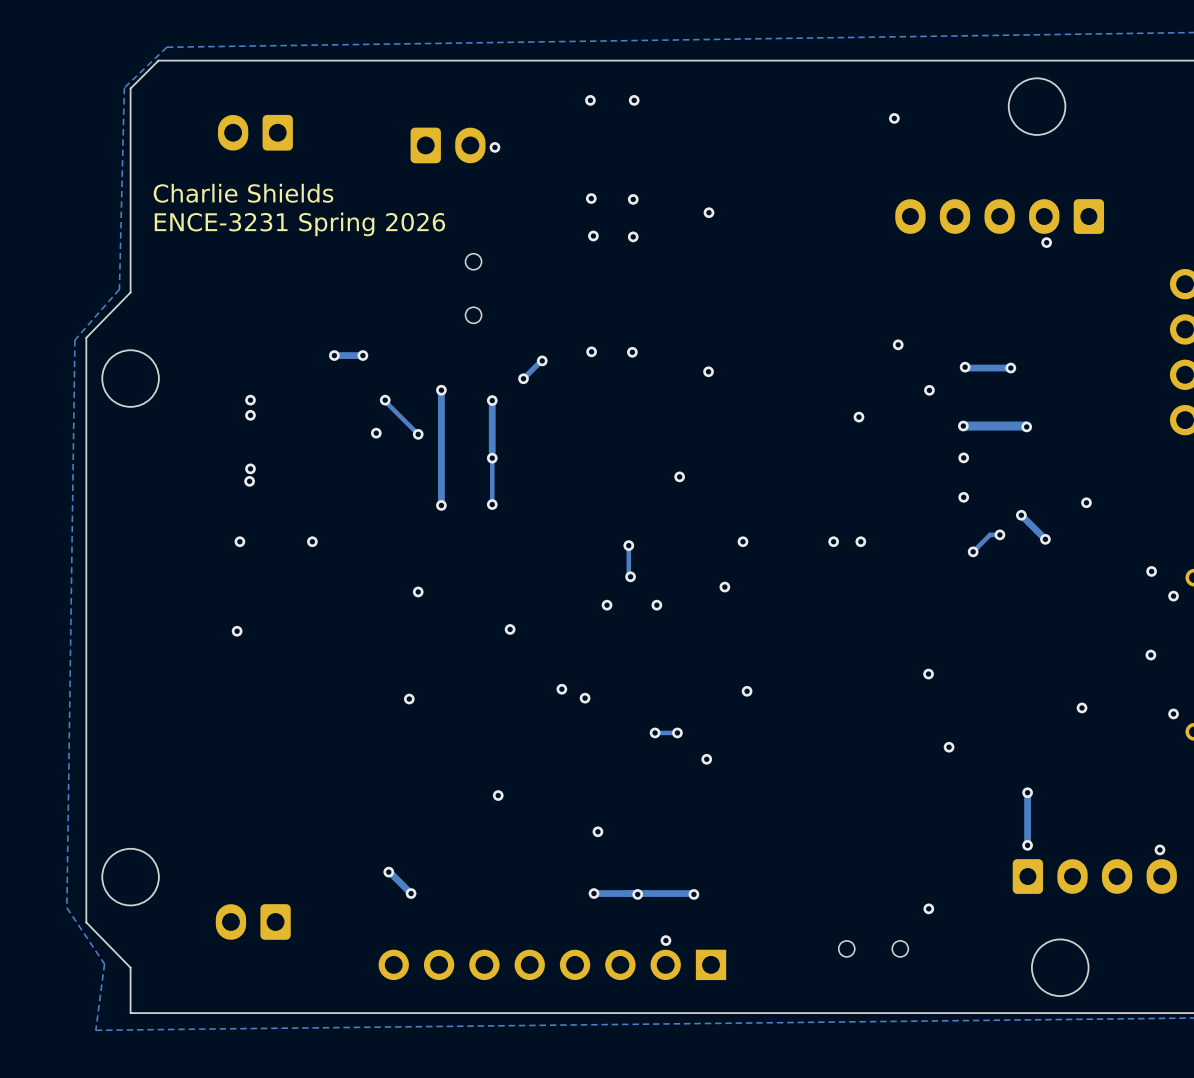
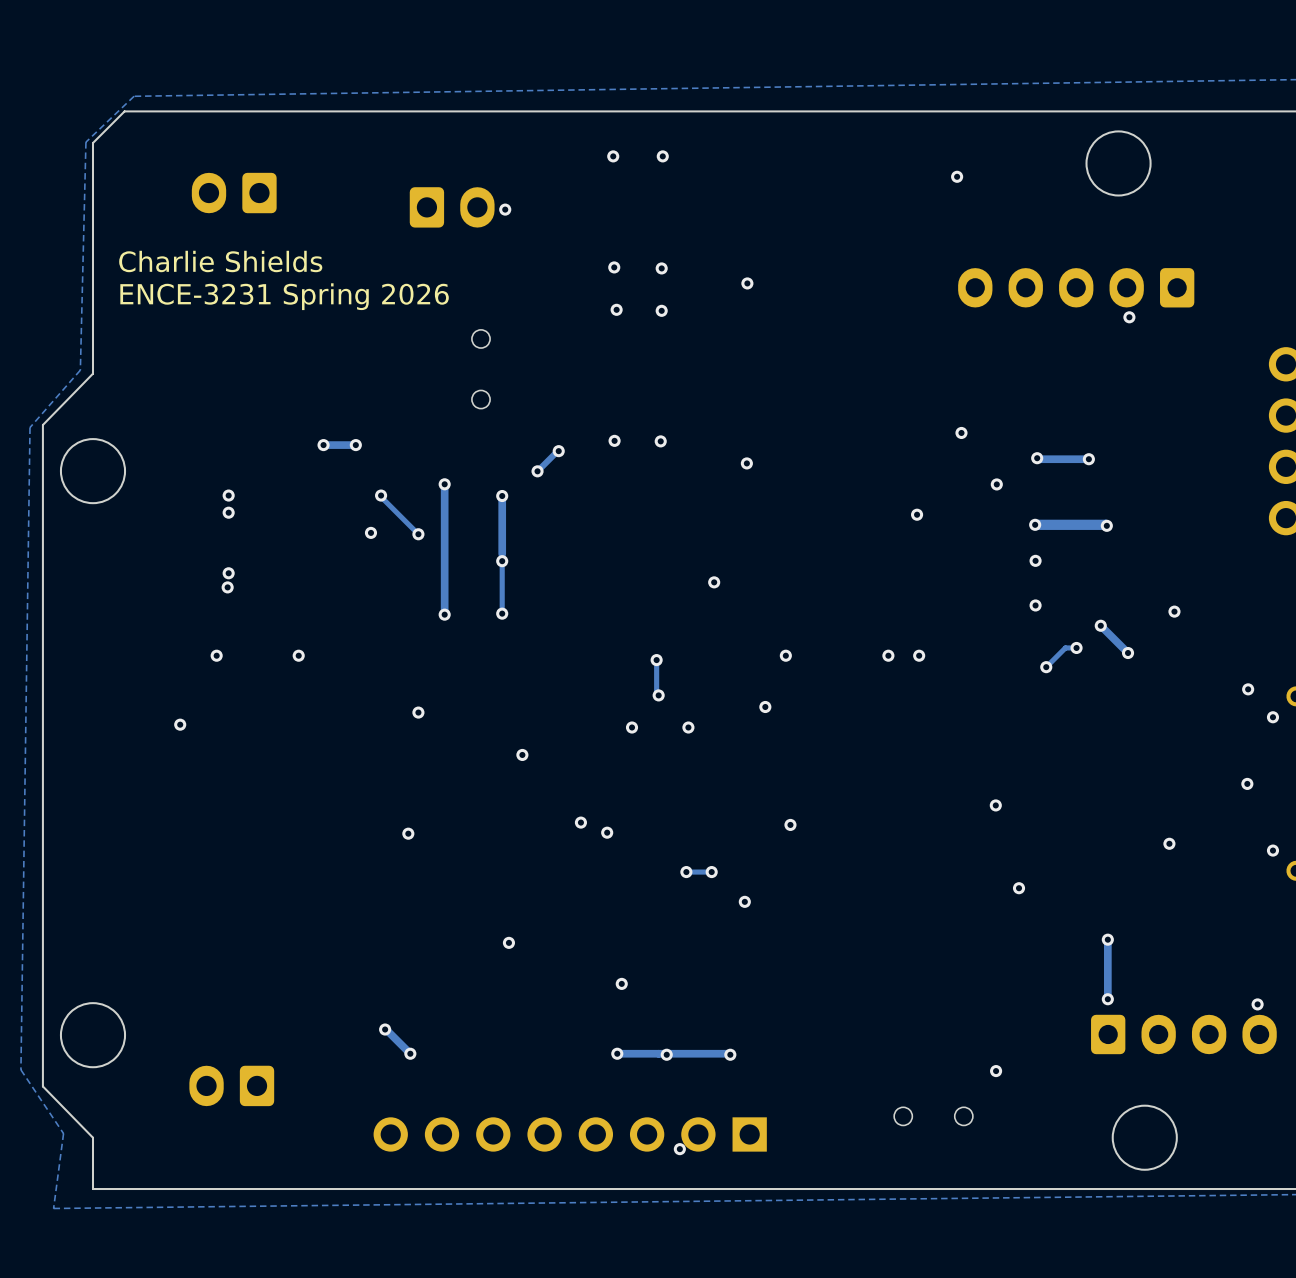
via position: (237, 631) -> (180, 724)
via position: (665, 940) -> (679, 1149)

